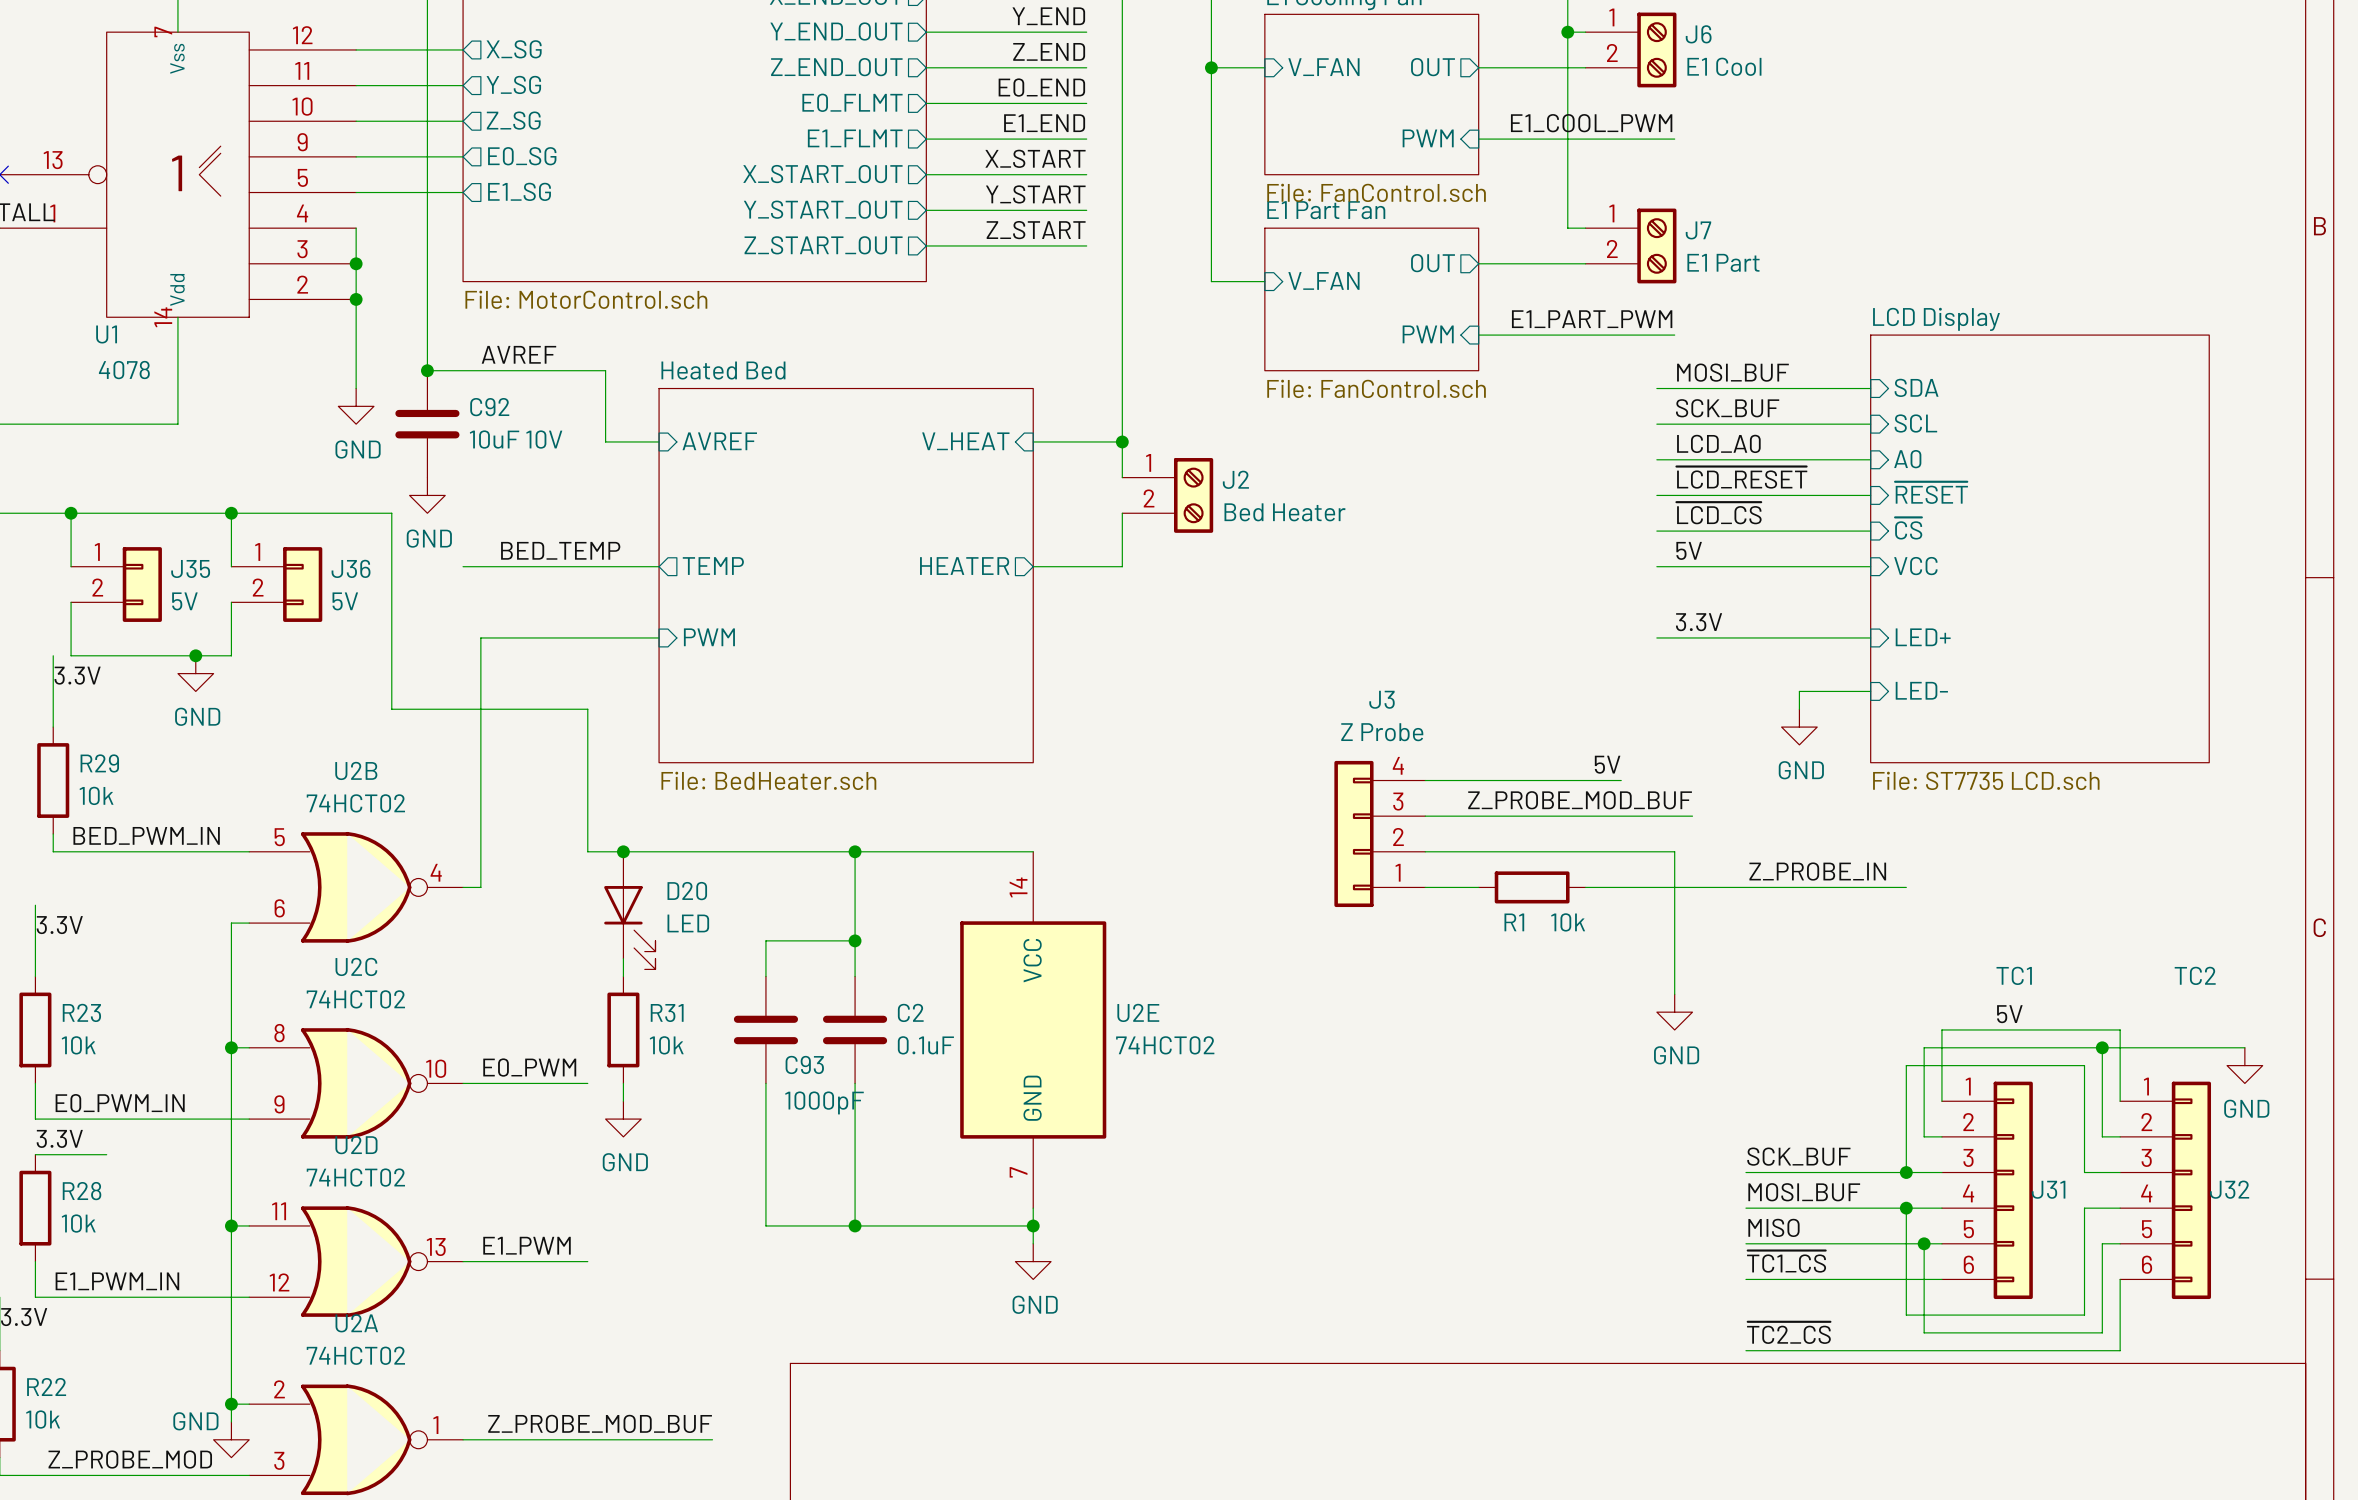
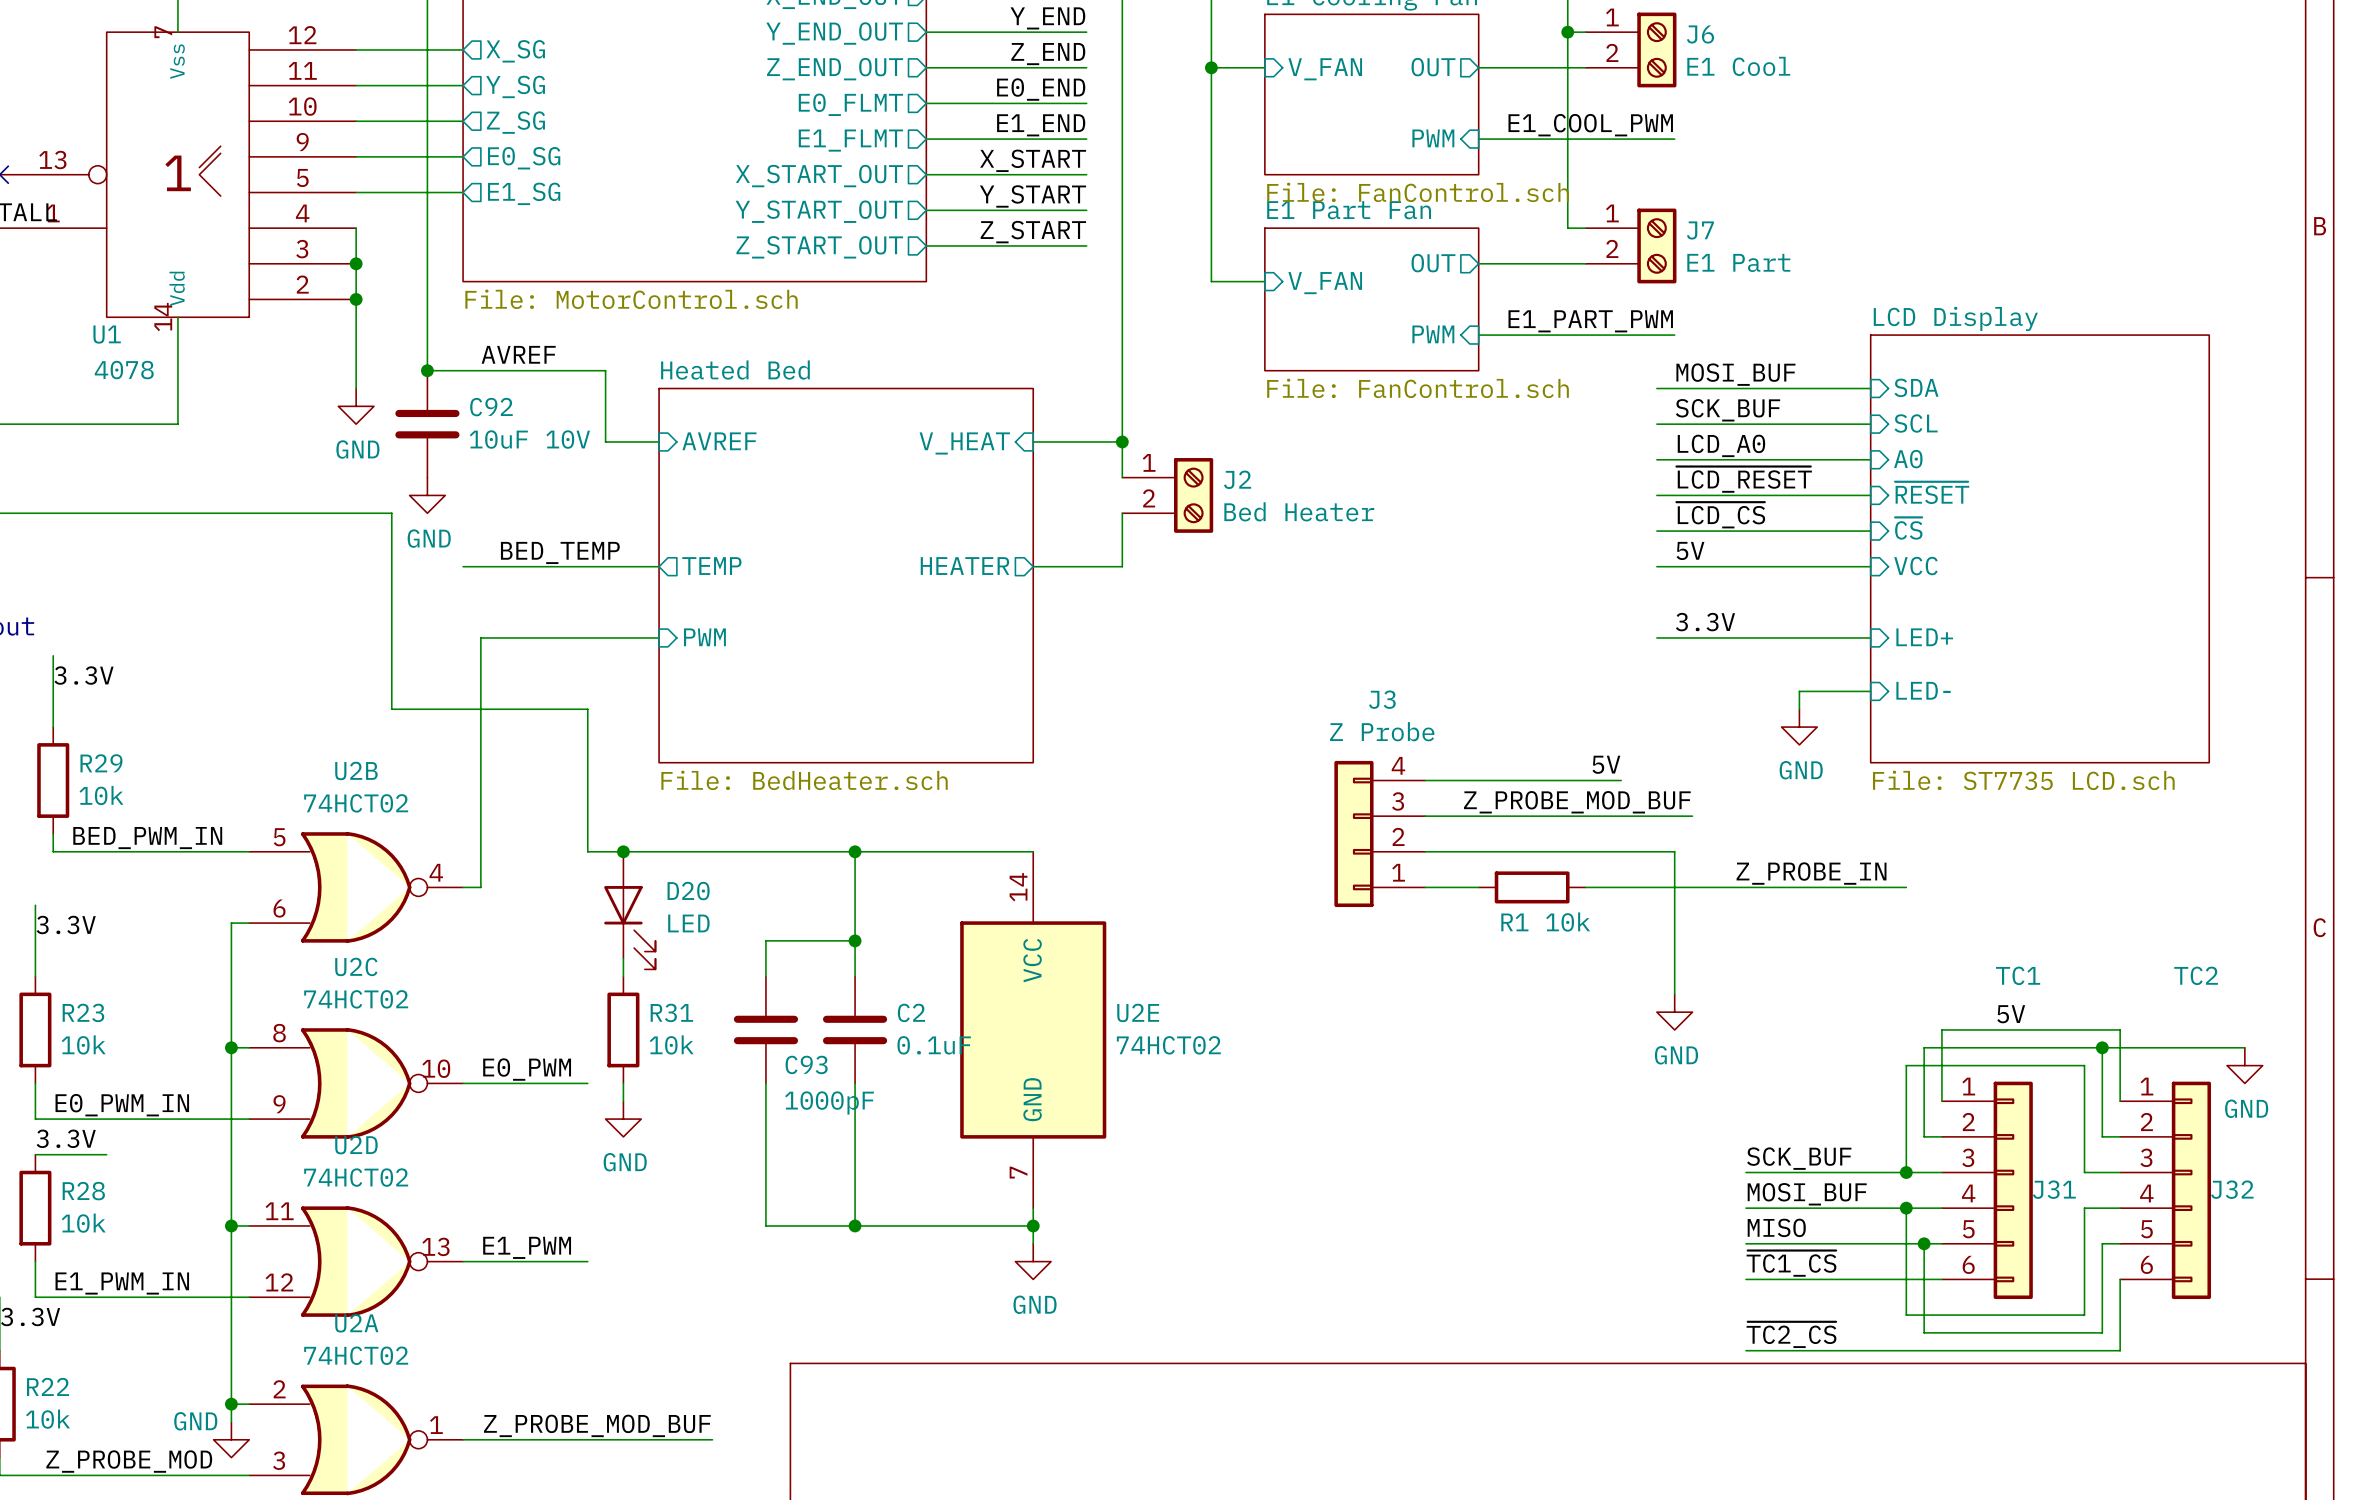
wire: (71, 513) (71, 566) -> none
junction: (71, 513) -> none
wire: (231, 513) (231, 566) -> none
junction: (231, 513) -> none
J35: 5V (116, 584) -> none
J36: 5V (276, 584) -> none
wire: (71, 602) (71, 655) (231, 655) (231, 602) -> none
junction: (195, 655) -> none
power symbol: GND (195, 673) -> none

